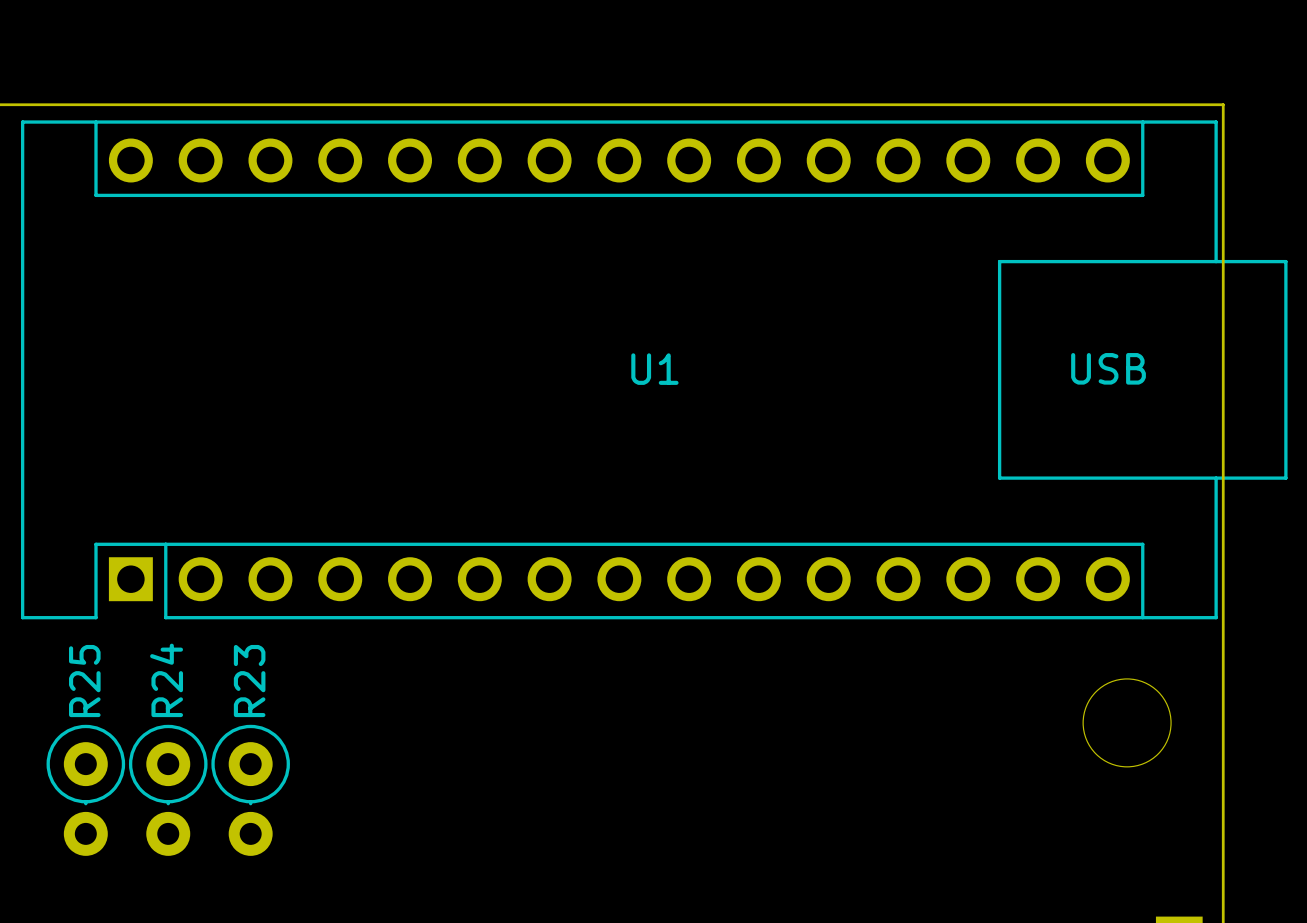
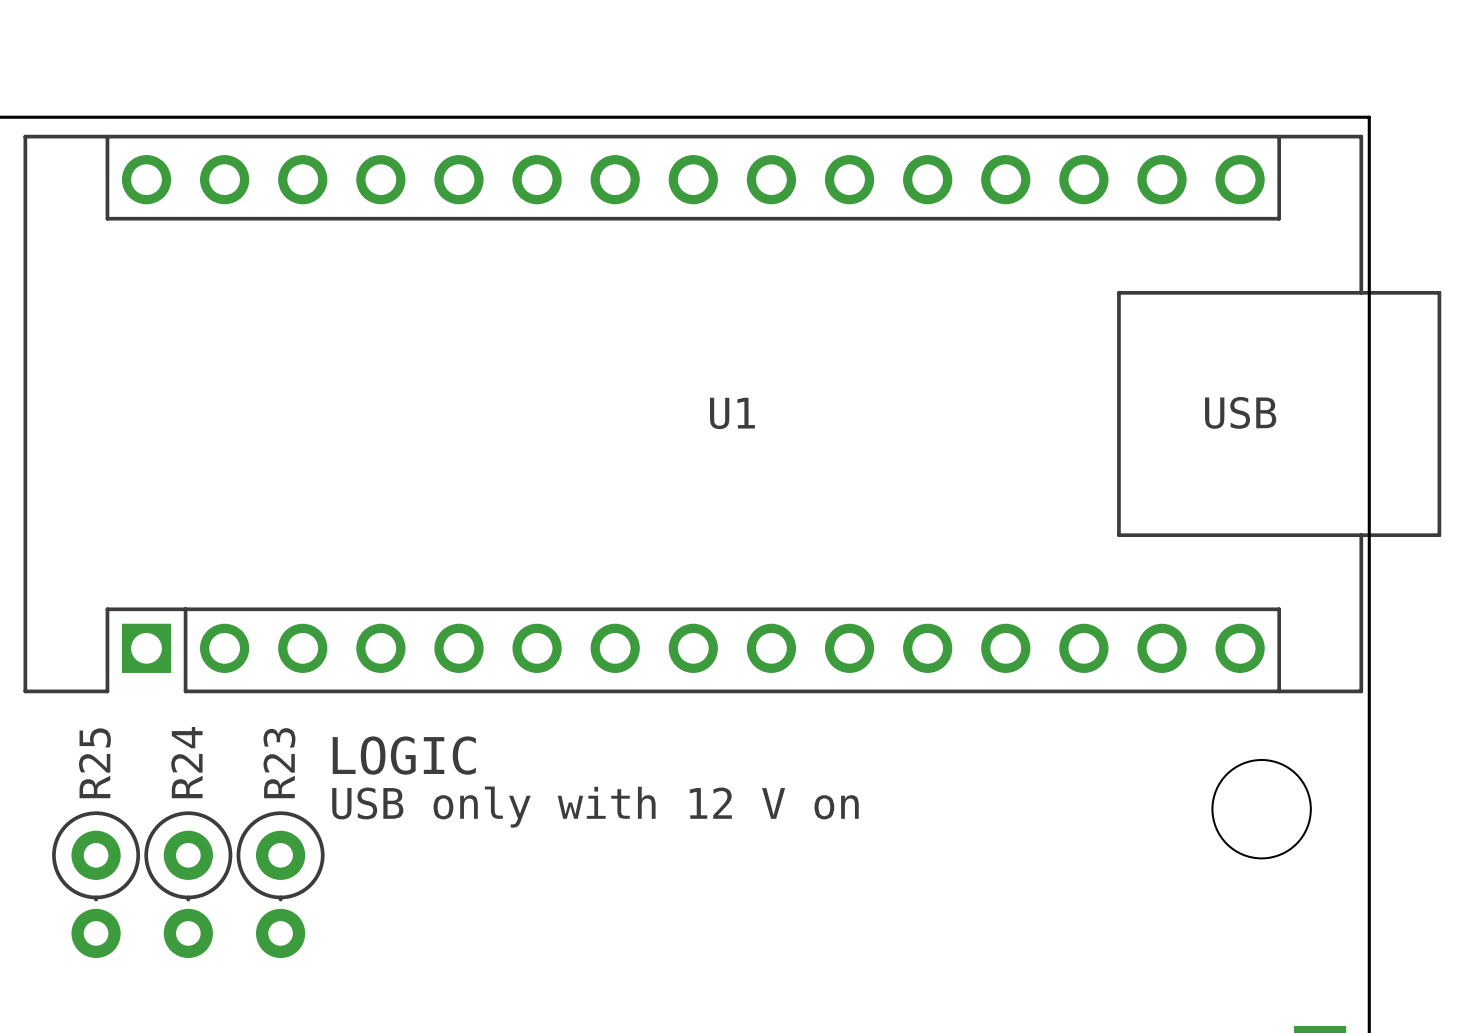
text: none -> LOGIC (404, 755)
text: none -> USB only with 12 V on (595, 807)

